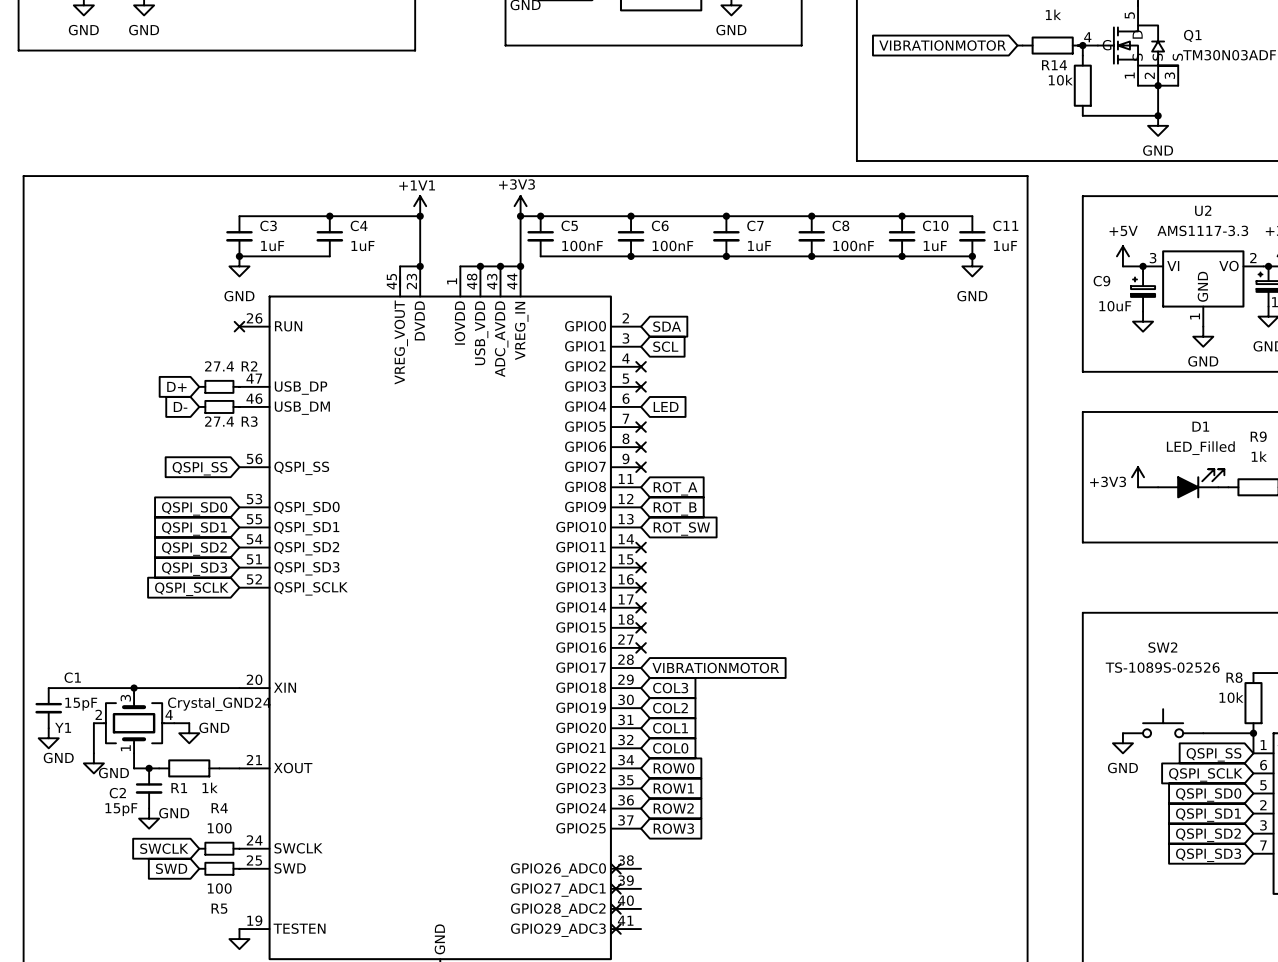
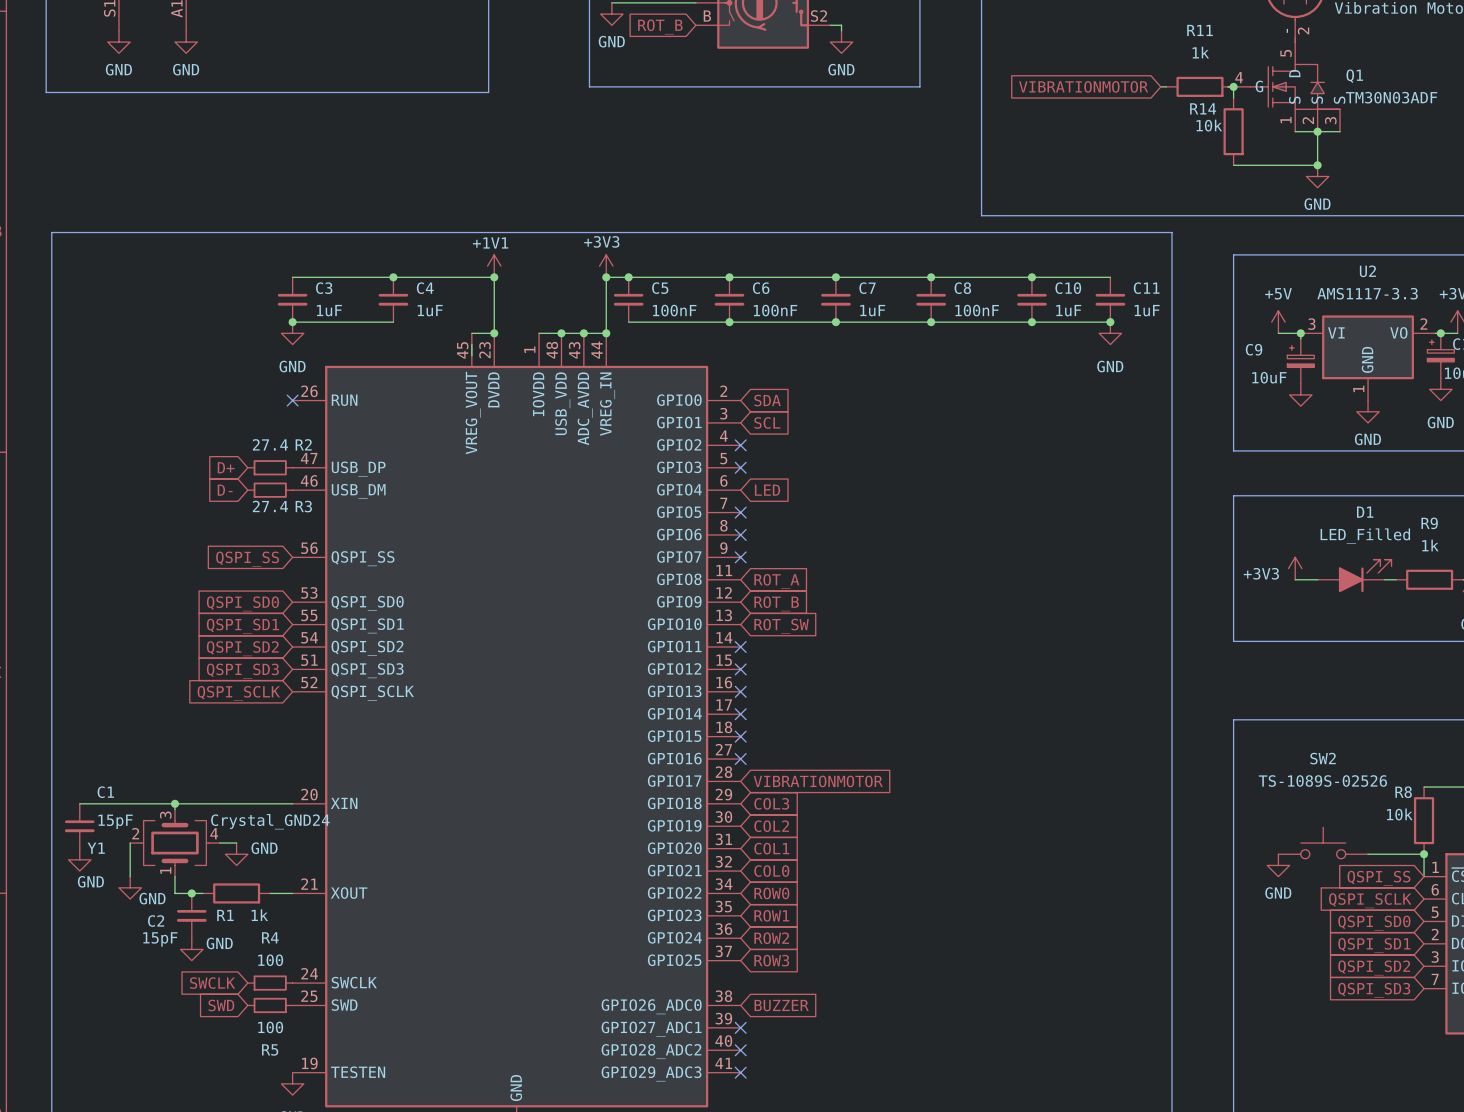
no-connect mark: (615, 868) -> none
global label: none -> BUZZER (781, 1005)
no-connect mark: (615, 888) -> none
no-connect mark: none -> (740, 1027)
no-connect mark: (615, 908) -> none
no-connect mark: none -> (740, 1050)
no-connect mark: (615, 929) -> none
no-connect mark: none -> (740, 1072)

